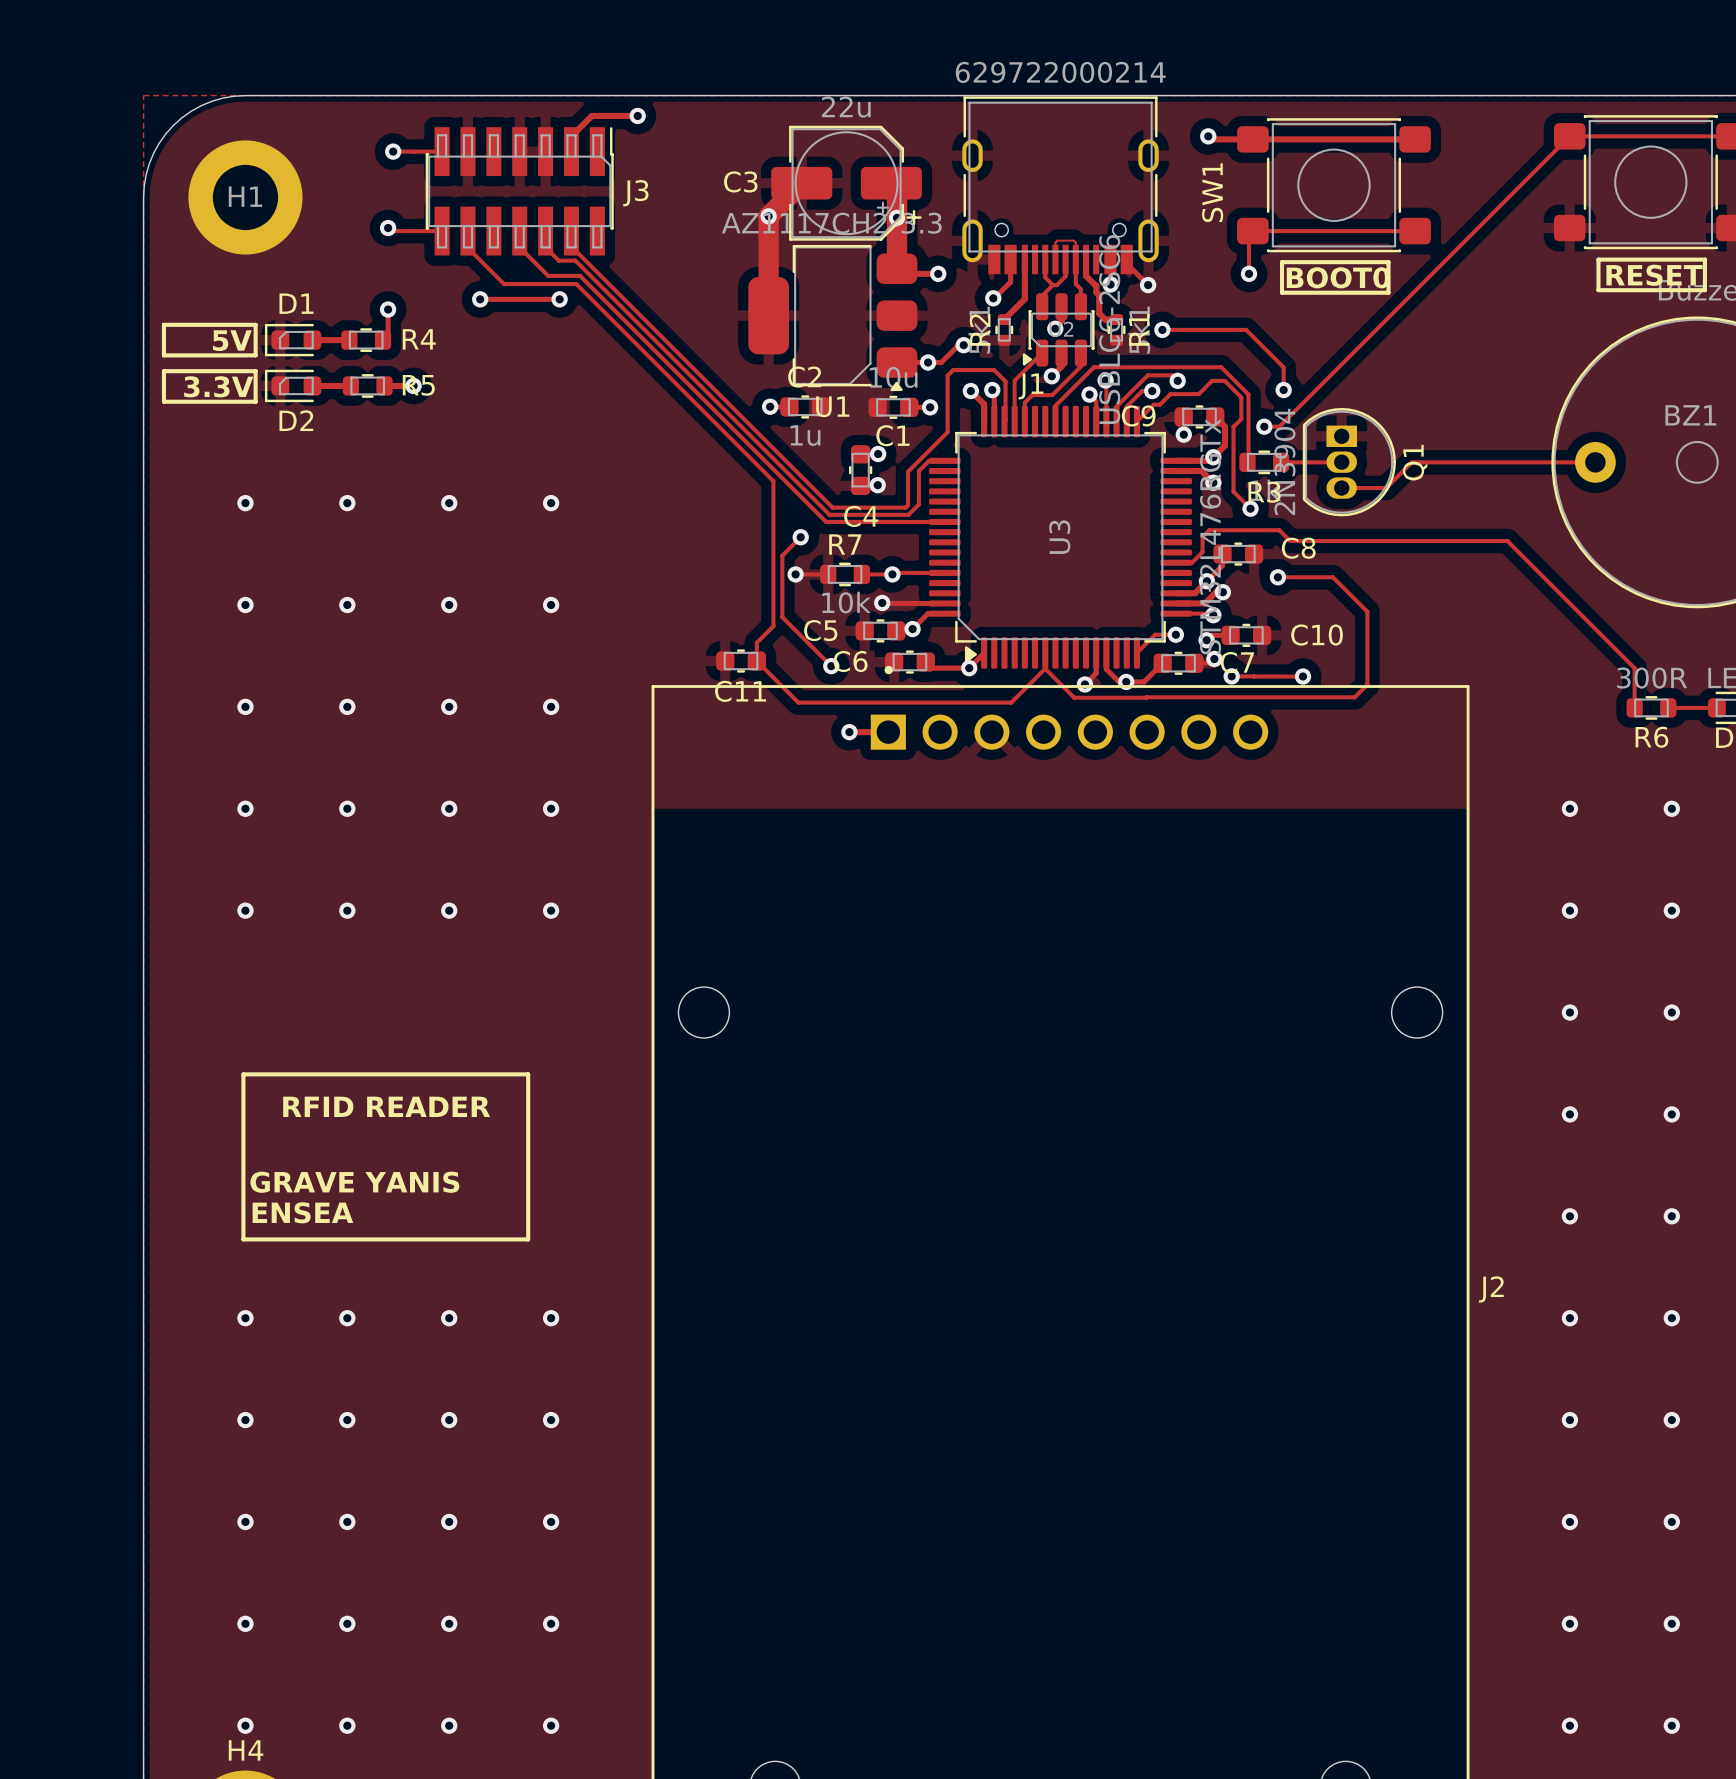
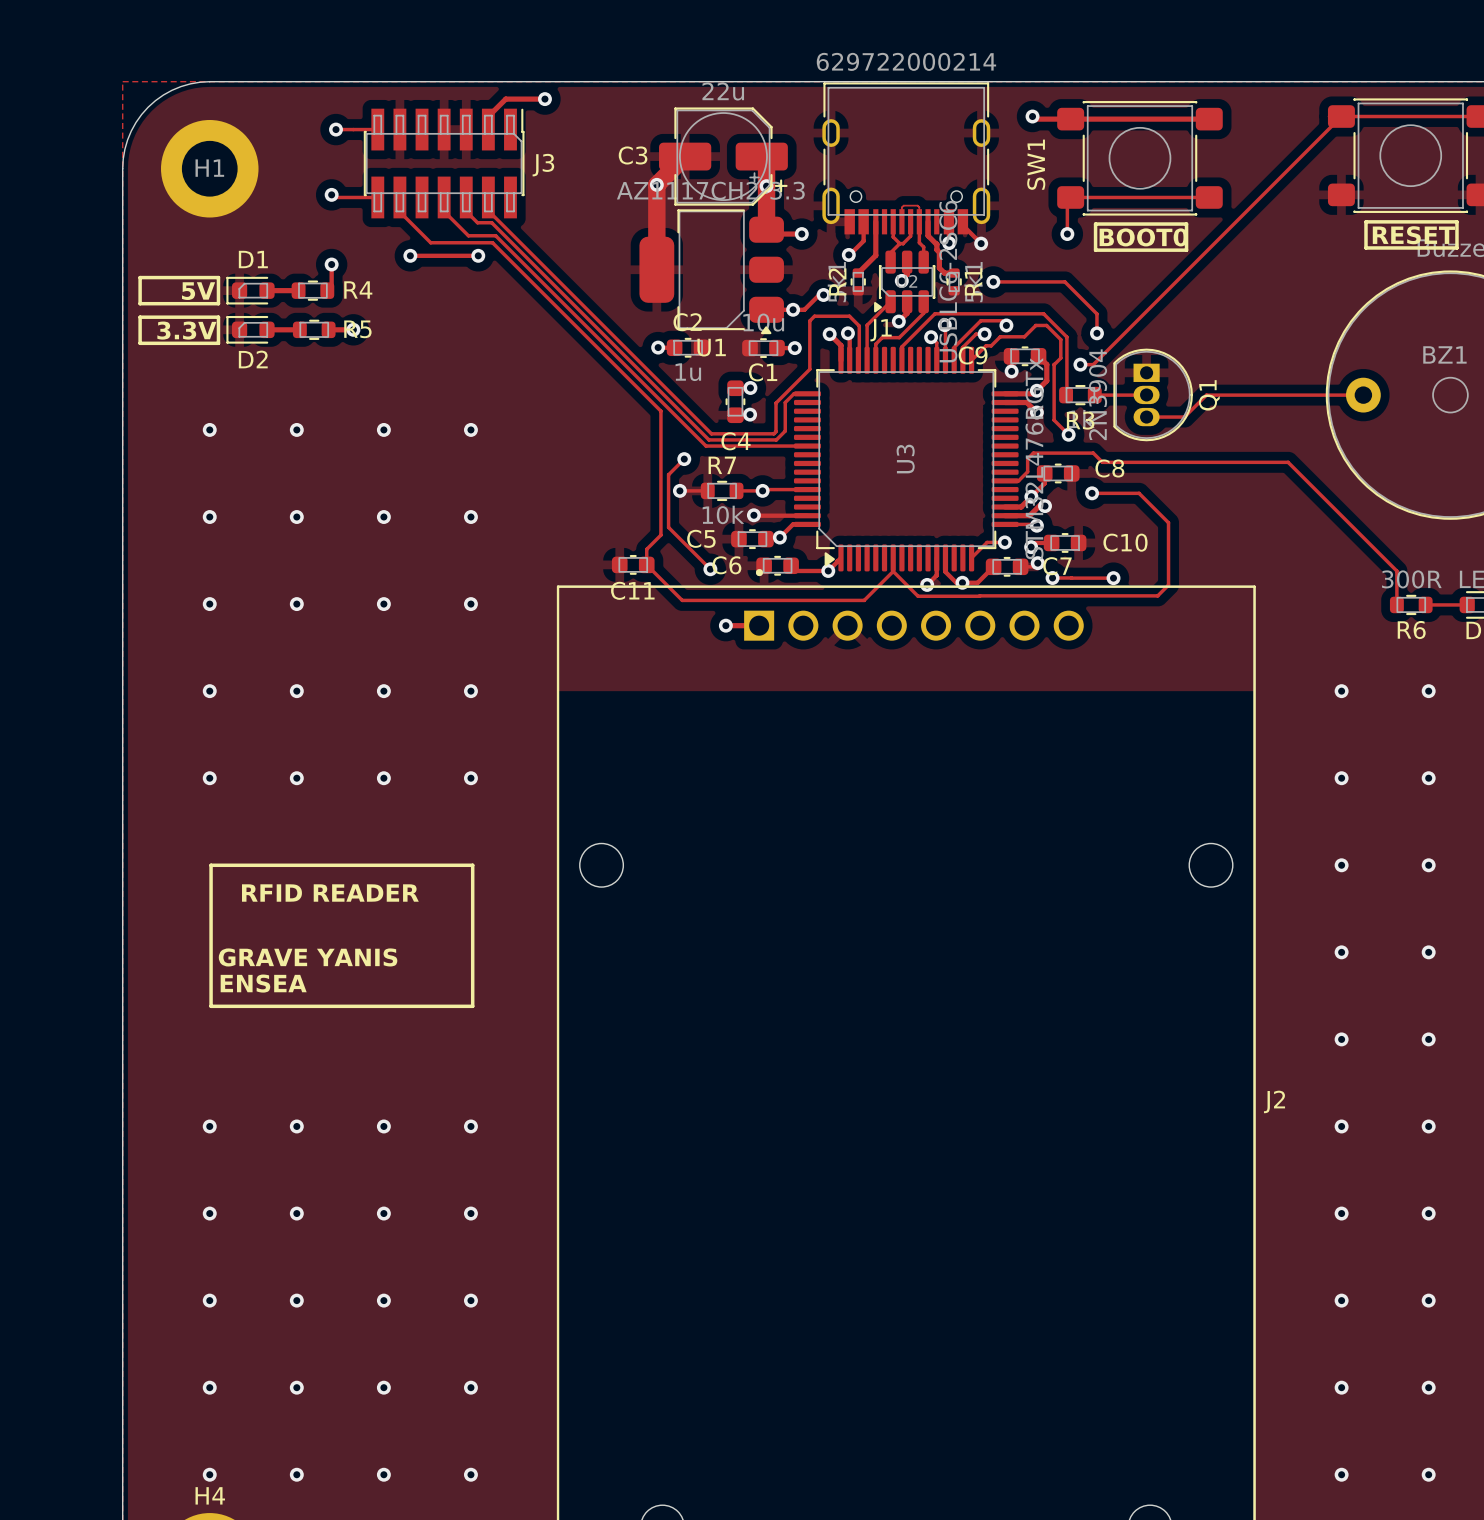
line: none -> (211, 865) (472, 865) (472, 1006) (211, 1006) (211, 865)
line: (243, 1074) (528, 1074) (528, 1239) (243, 1239) (243, 1074) -> none
text position: RFID READER (386, 1106) -> RFID READER (330, 893)
text position: GRAVE YANIS (354, 1182) -> GRAVE YANIS (308, 957)
text position: ENSEA (302, 1212) -> ENSEA (263, 983)

